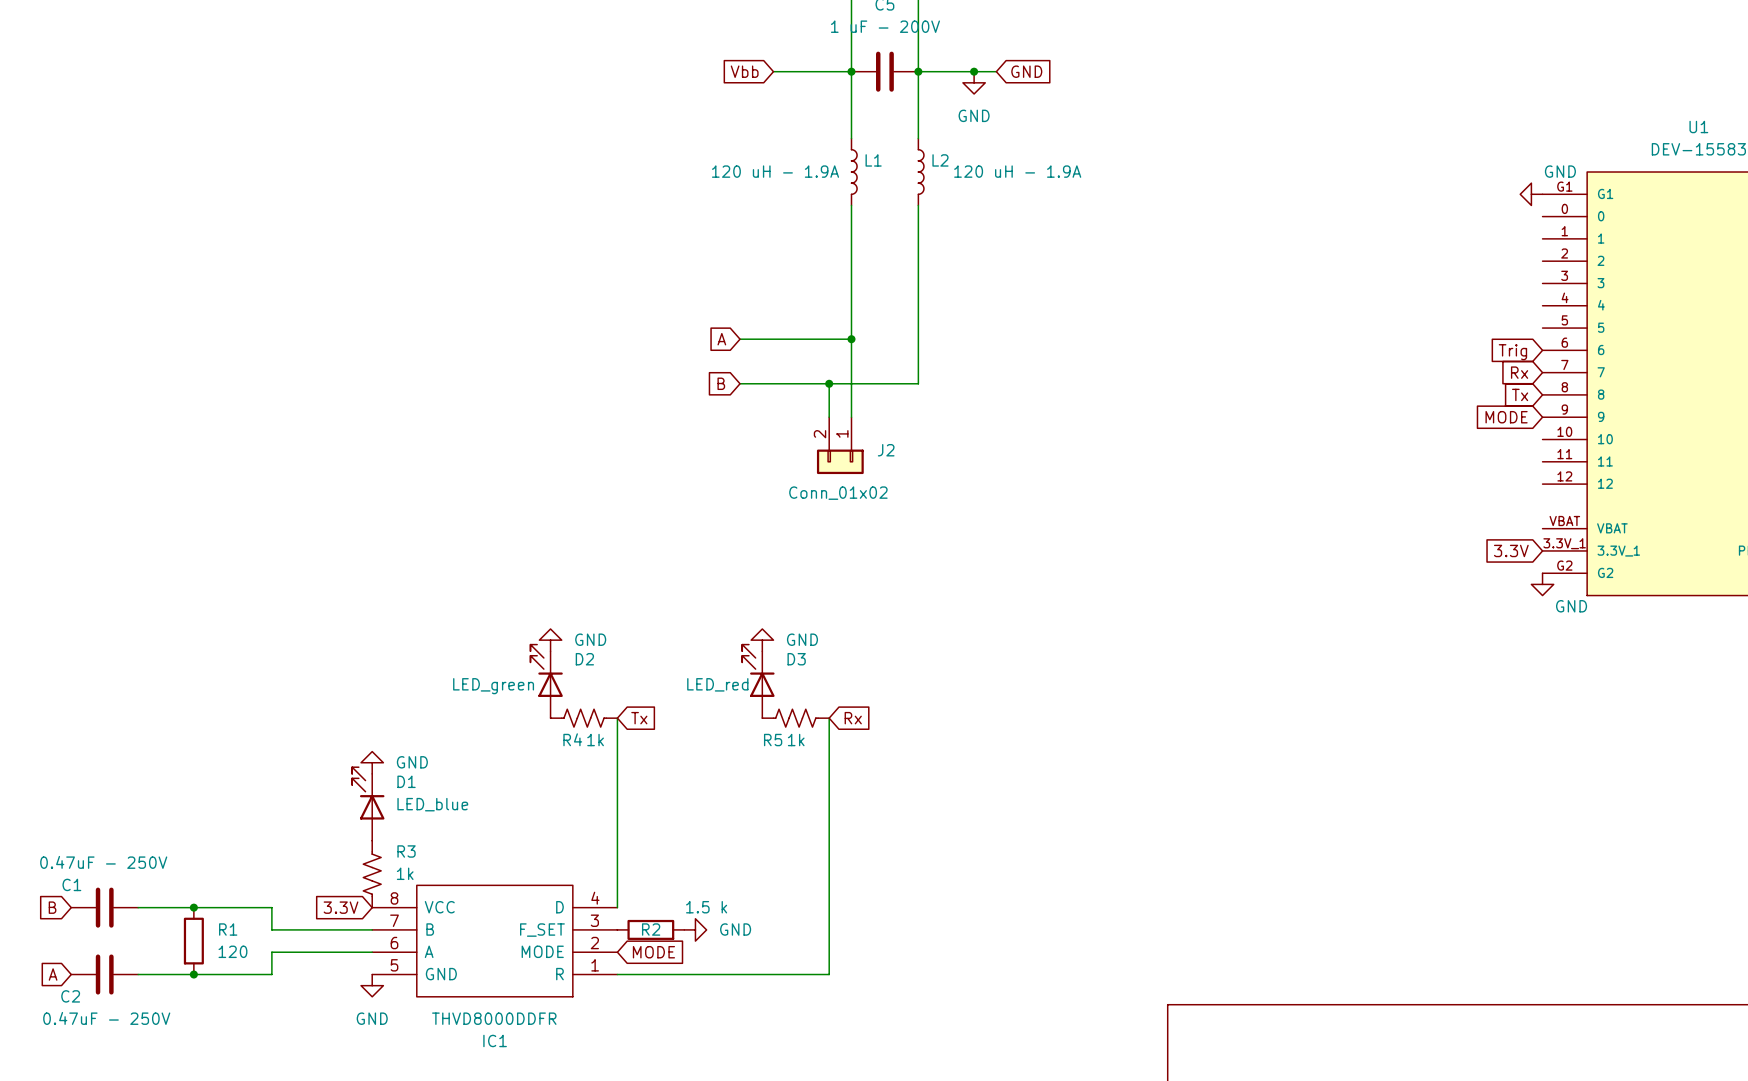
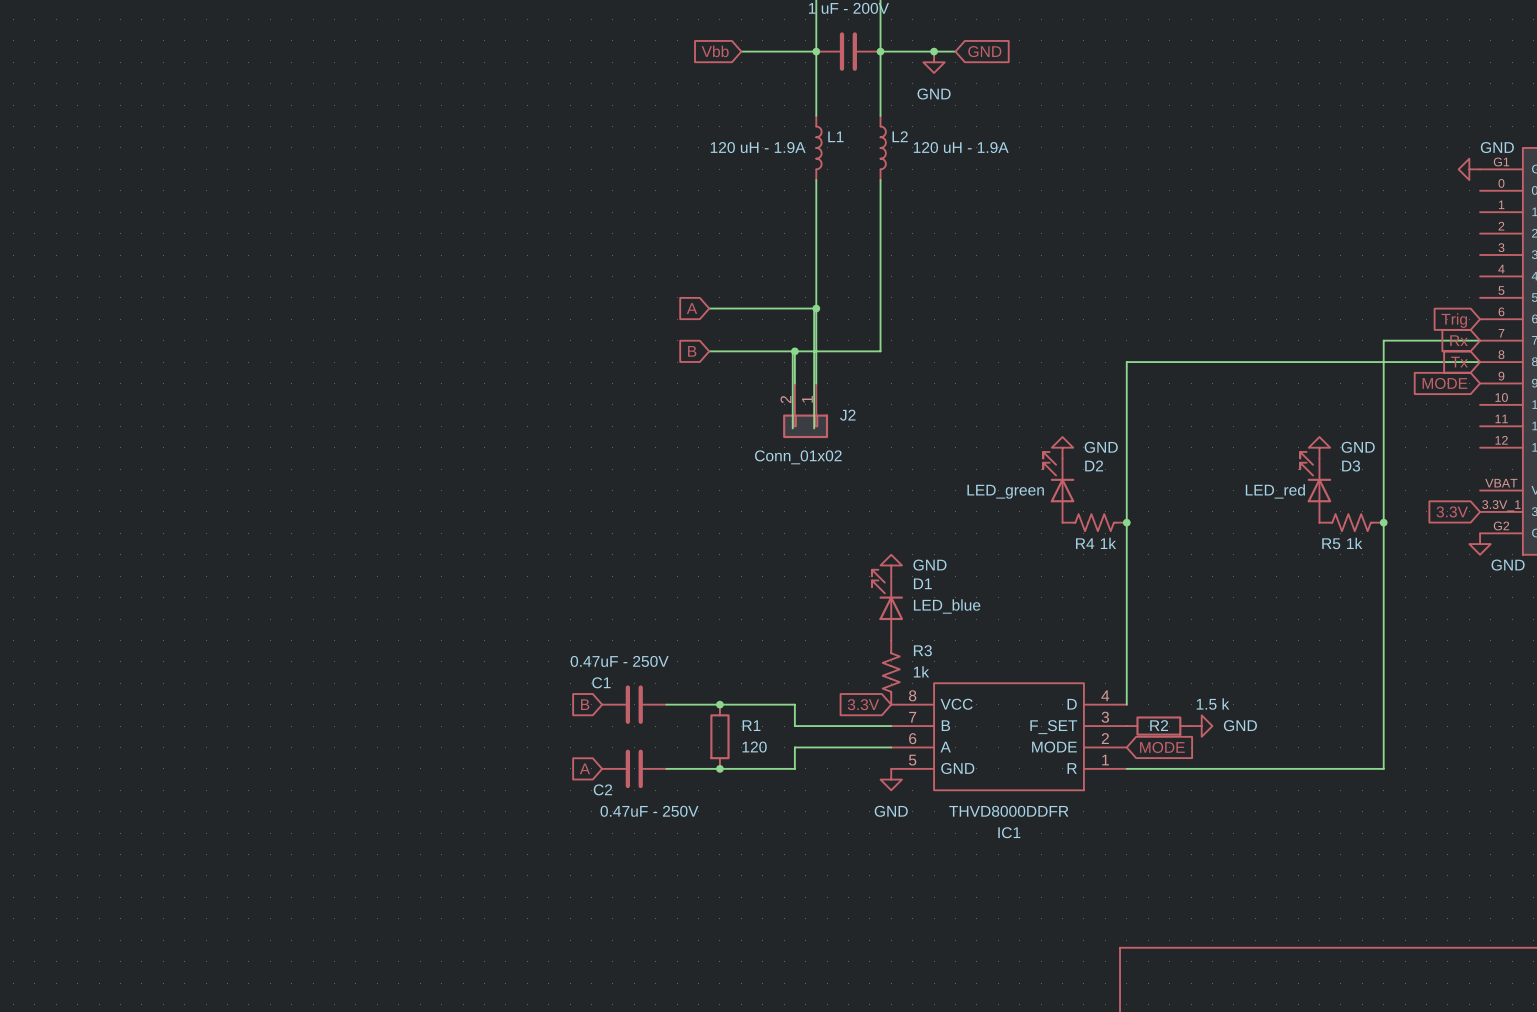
wire: none -> (814, 308) (814, 428)
wire: none -> (1480, 340) (1383, 340) (1383, 768) (1126, 768)
wire: none -> (792, 351) (792, 428)
wire: none -> (1480, 362) (1126, 362) (1126, 704)
power symbol: none -> GND (1062, 447)
power symbol: none -> GND (1319, 447)
junction: none -> (1126, 522)
junction: none -> (1383, 522)
power symbol: none -> GND (891, 565)
power symbol: GND (550, 640) -> none
power symbol: GND (762, 640) -> none
D2 position: (546, 681) -> (1058, 487)
D3 position: (758, 681) -> (1315, 487)
R4 position: (583, 718) -> (1094, 522)
wire: (617, 718) (617, 907) -> none
global label: Tx (639, 718) -> none
R5 position: (795, 718) -> (1351, 522)
wire: (829, 718) (829, 751) -> (666, 704) (794, 704)
global label: Rx (853, 718) -> none
global label: none -> B (585, 704)
junction: none -> (719, 704)
global label: none -> 3.3V (863, 704)
power symbol: GND (372, 762) -> none
wire: (829, 773) (829, 796) -> (794, 726) (891, 726)
power symbol: none -> GND (1201, 726)
wire: none -> (794, 747) (891, 747)
global label: none -> MODE (1162, 747)
D1 position: (368, 803) -> (887, 605)
global label: none -> A (584, 768)
junction: none -> (719, 768)
wire: (829, 818) (829, 974) (617, 974) -> (794, 768) (666, 768)
power symbol: none -> GND (891, 779)
R3 position: (372, 874) -> (891, 672)
global label: B (52, 907) -> none
C1 position: (104, 907) -> (634, 704)
wire: (138, 907) (271, 907) (271, 929) (372, 929) -> none
junction: (193, 907) -> none
global label: 3.3V (341, 907) -> none
R2 position: (650, 929) -> (1158, 726)
power symbol: GND (695, 929) -> none
R1 position: (193, 941) -> (719, 736)
IC1 position: (494, 941) -> (1009, 736)
wire: (372, 952) (271, 952) (271, 974) (138, 974) -> none
global label: MODE (653, 952) -> none
global label: A (53, 974) -> none
C2 position: (104, 974) -> (634, 768)
junction: (193, 974) -> none
power symbol: GND (372, 985) -> none

